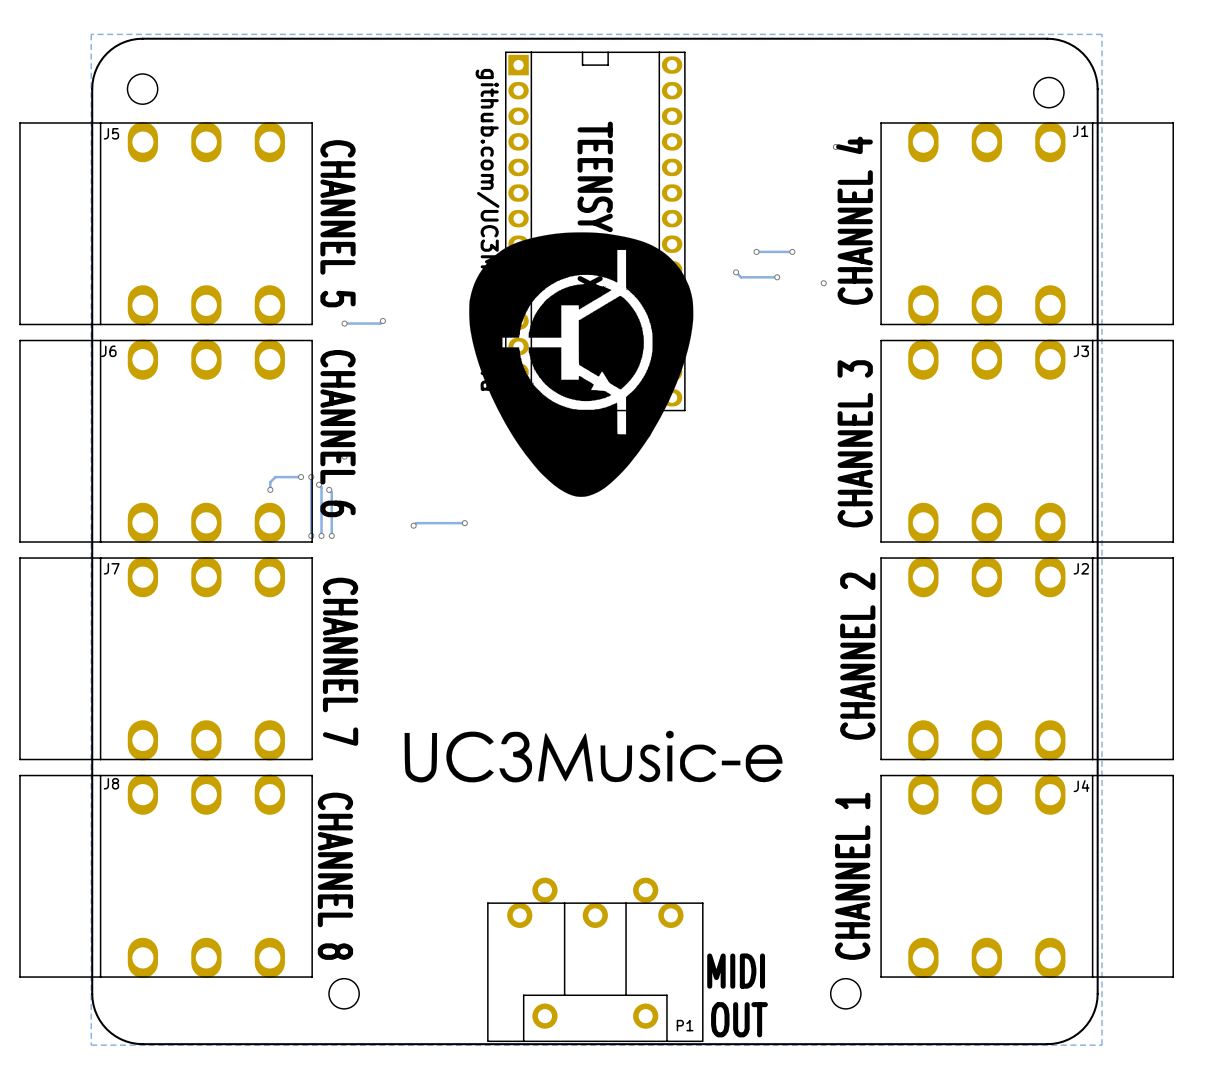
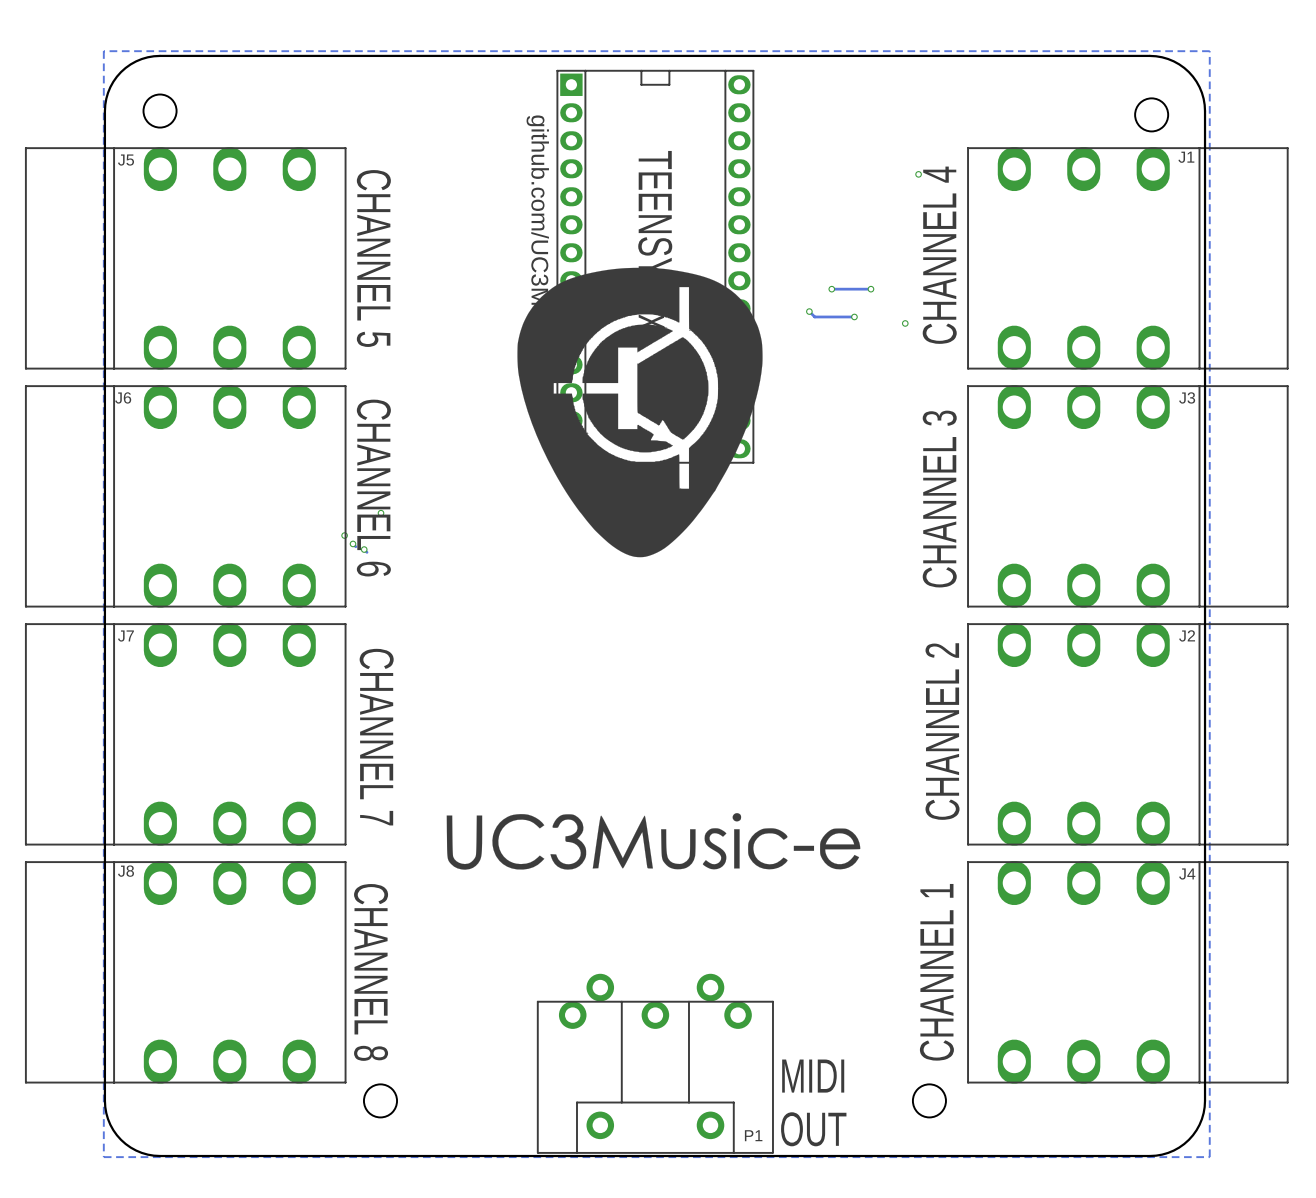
track: (382, 320) (380, 323) (344, 323) -> none
via: (382, 320) -> none
via: (344, 323) -> none
track: (301, 477) (275, 477) (270, 482) (270, 489) -> none
via: (301, 477) -> none
track: (311, 477) (311, 535) -> none
track: (321, 487) (321, 535) -> none
via: (270, 489) -> none
track: (331, 492) (331, 535) -> none
track: (464, 523) (416, 523) (413, 525) -> none
via: (464, 523) -> none
via: (413, 525) -> none
via: (311, 535) -> none
via: (321, 535) -> none
via: (331, 535) -> none

